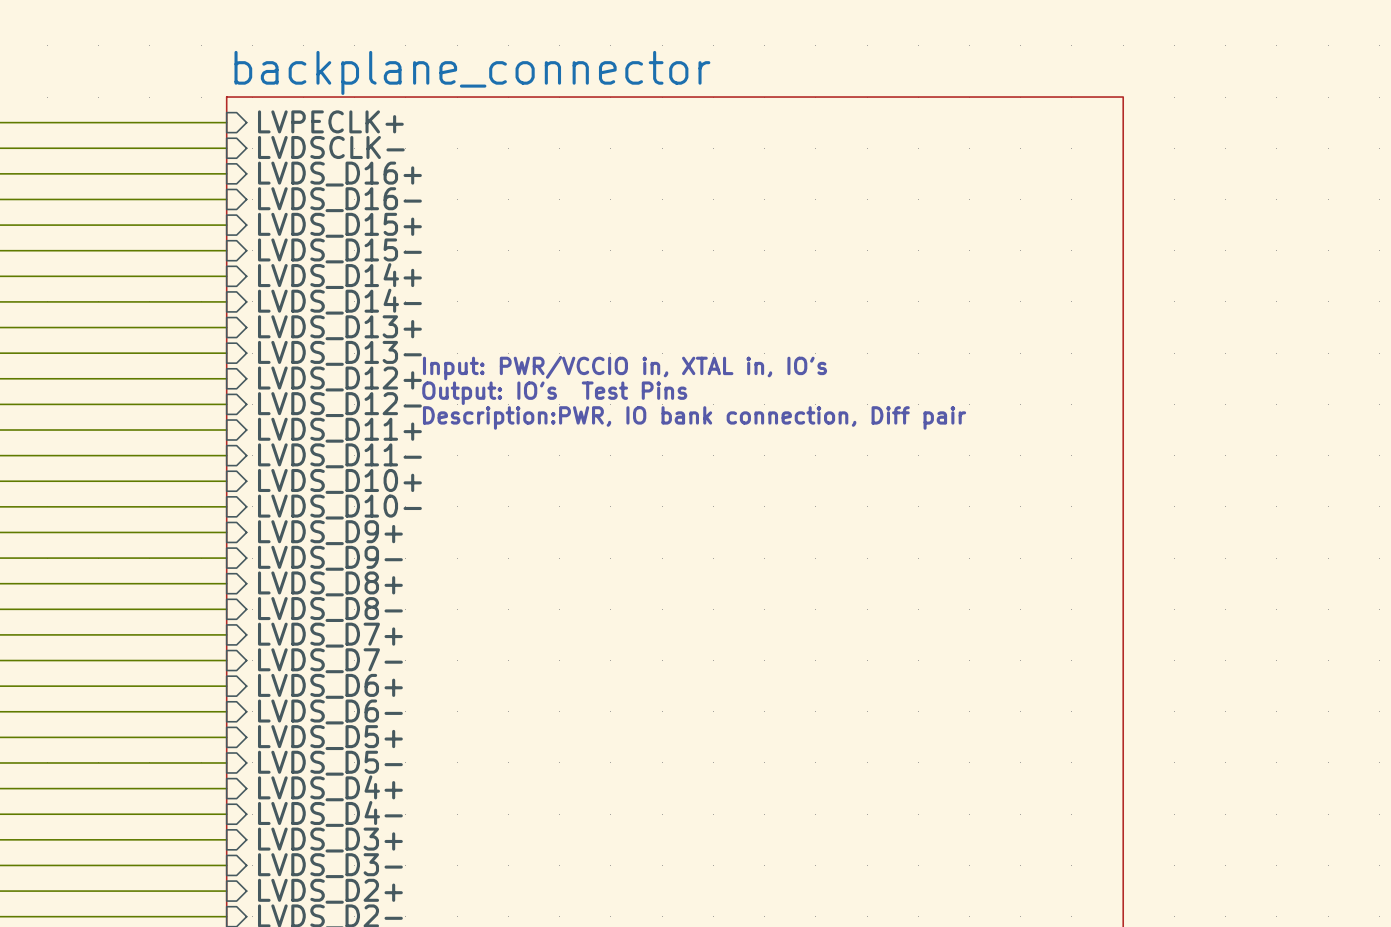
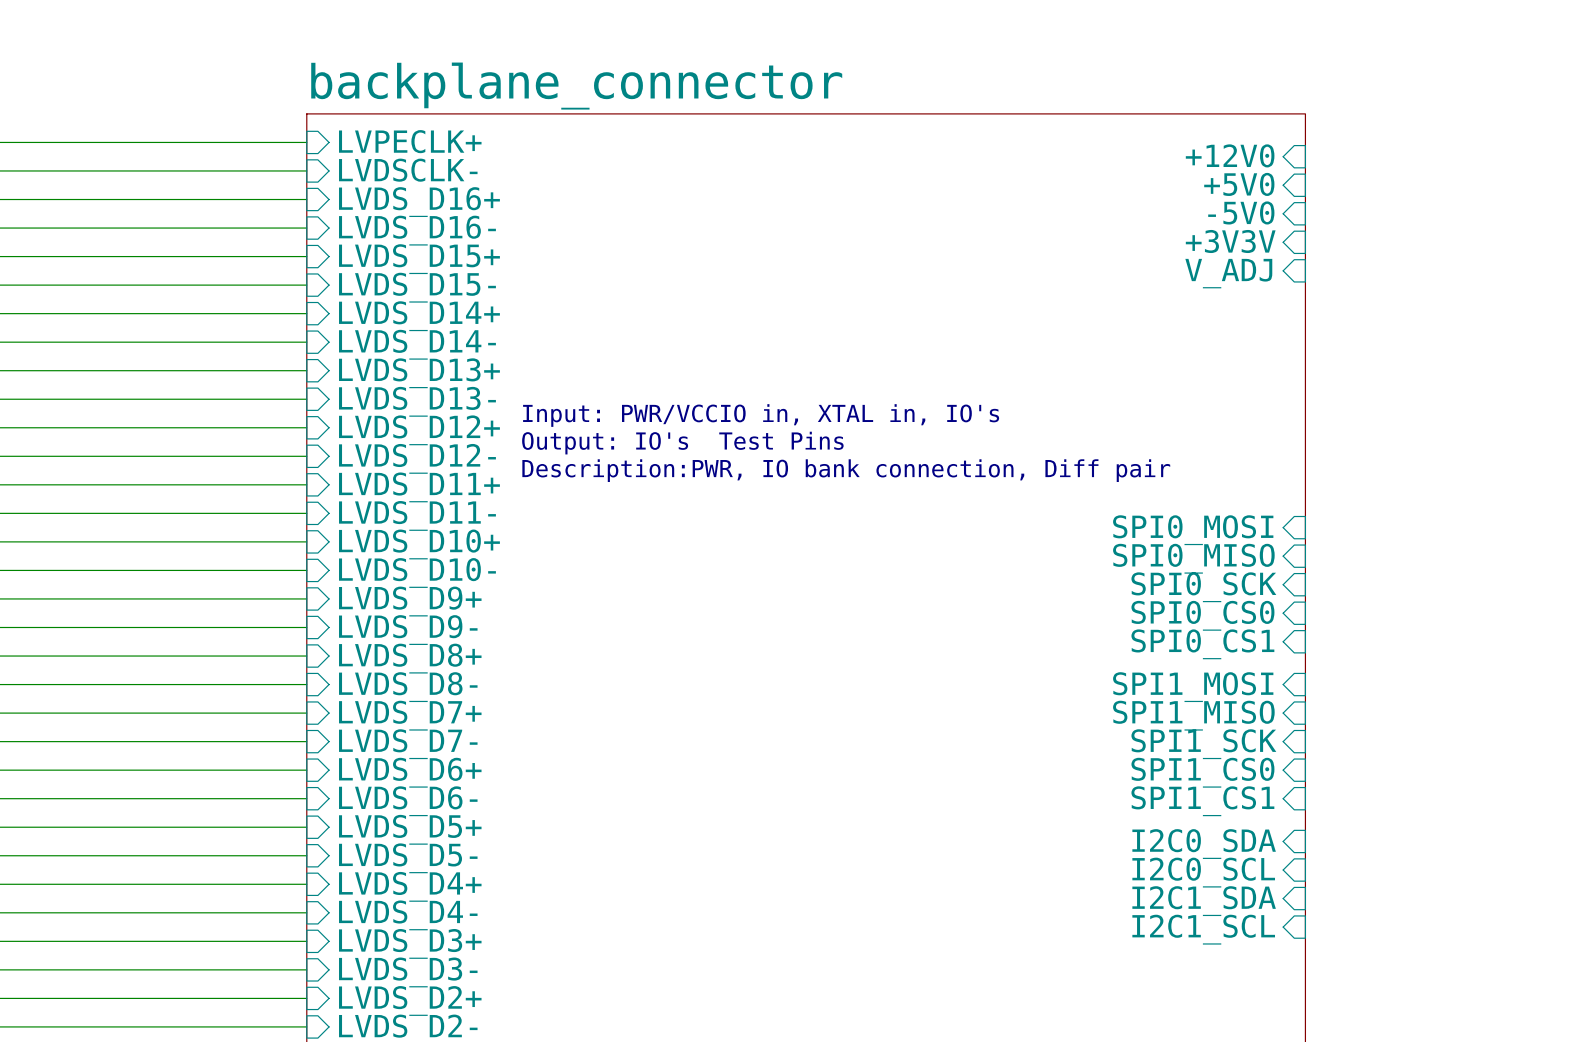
sheet pin: none -> +12V0 (1230, 155)
sheet pin: none -> +5V0 (1239, 184)
sheet pin: none -> -5V0 (1241, 212)
sheet pin: none -> +3V3V (1230, 241)
sheet pin: none -> V_ADJ (1228, 273)
sheet pin: none -> SPI0_MOSI (1193, 530)
sheet pin: none -> SPI0_MISO (1193, 558)
sheet pin: none -> SPI0_SCK (1203, 587)
sheet pin: none -> SPI0_CS0 (1202, 615)
sheet pin: none -> SPI0_CS1 (1202, 644)
sheet pin: none -> SPI1_MOSI (1193, 687)
sheet pin: none -> SPI1_MISO (1193, 715)
sheet pin: none -> SPI1_SCK (1203, 744)
sheet pin: none -> SPI1_CS0 (1202, 772)
sheet pin: none -> SPI1_CS1 (1202, 801)
sheet pin: none -> I2C0_SDA (1204, 844)
sheet pin: none -> I2C0_SCL (1203, 872)
sheet pin: none -> I2C1_SDA (1204, 901)
sheet pin: none -> I2C1_SCL (1203, 929)

